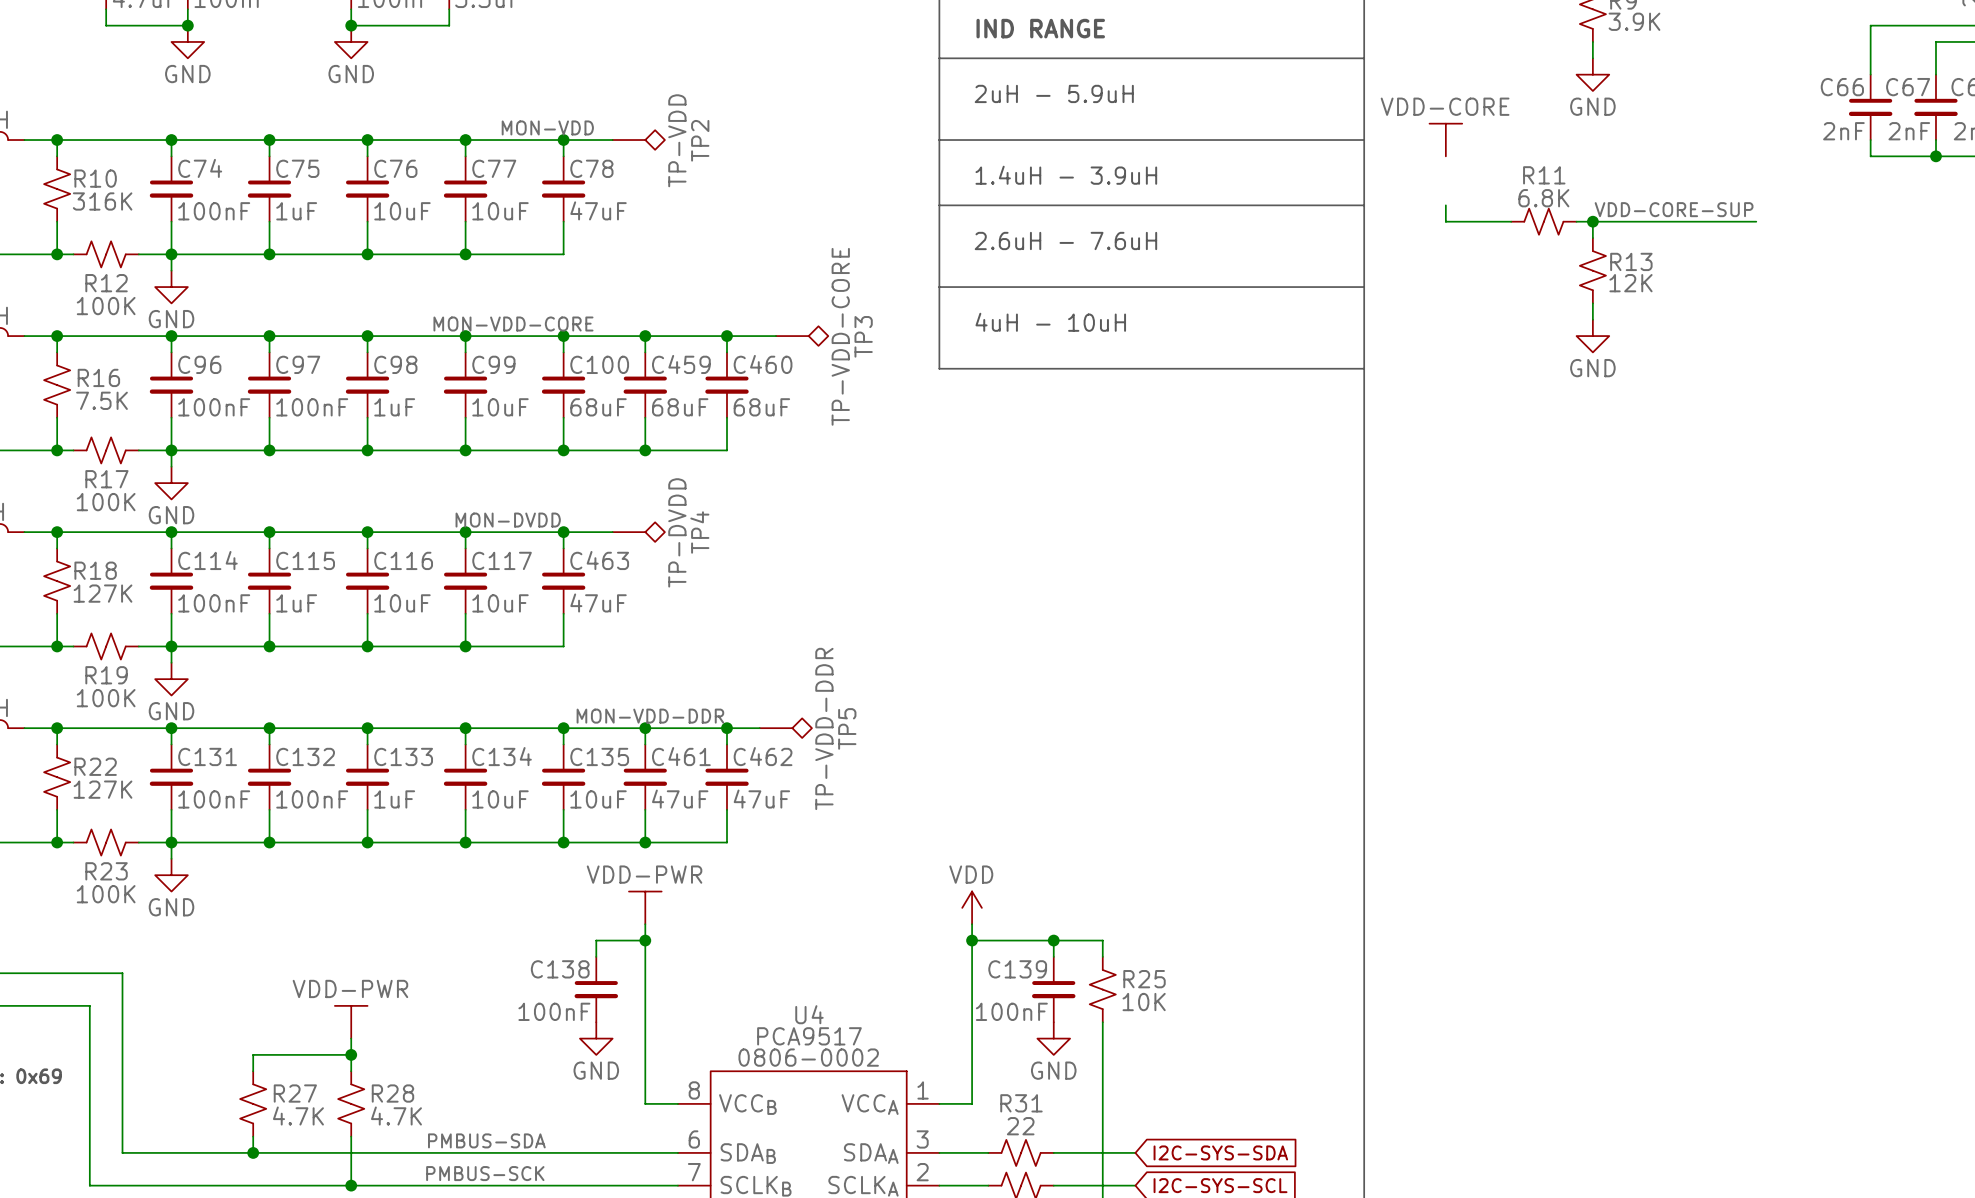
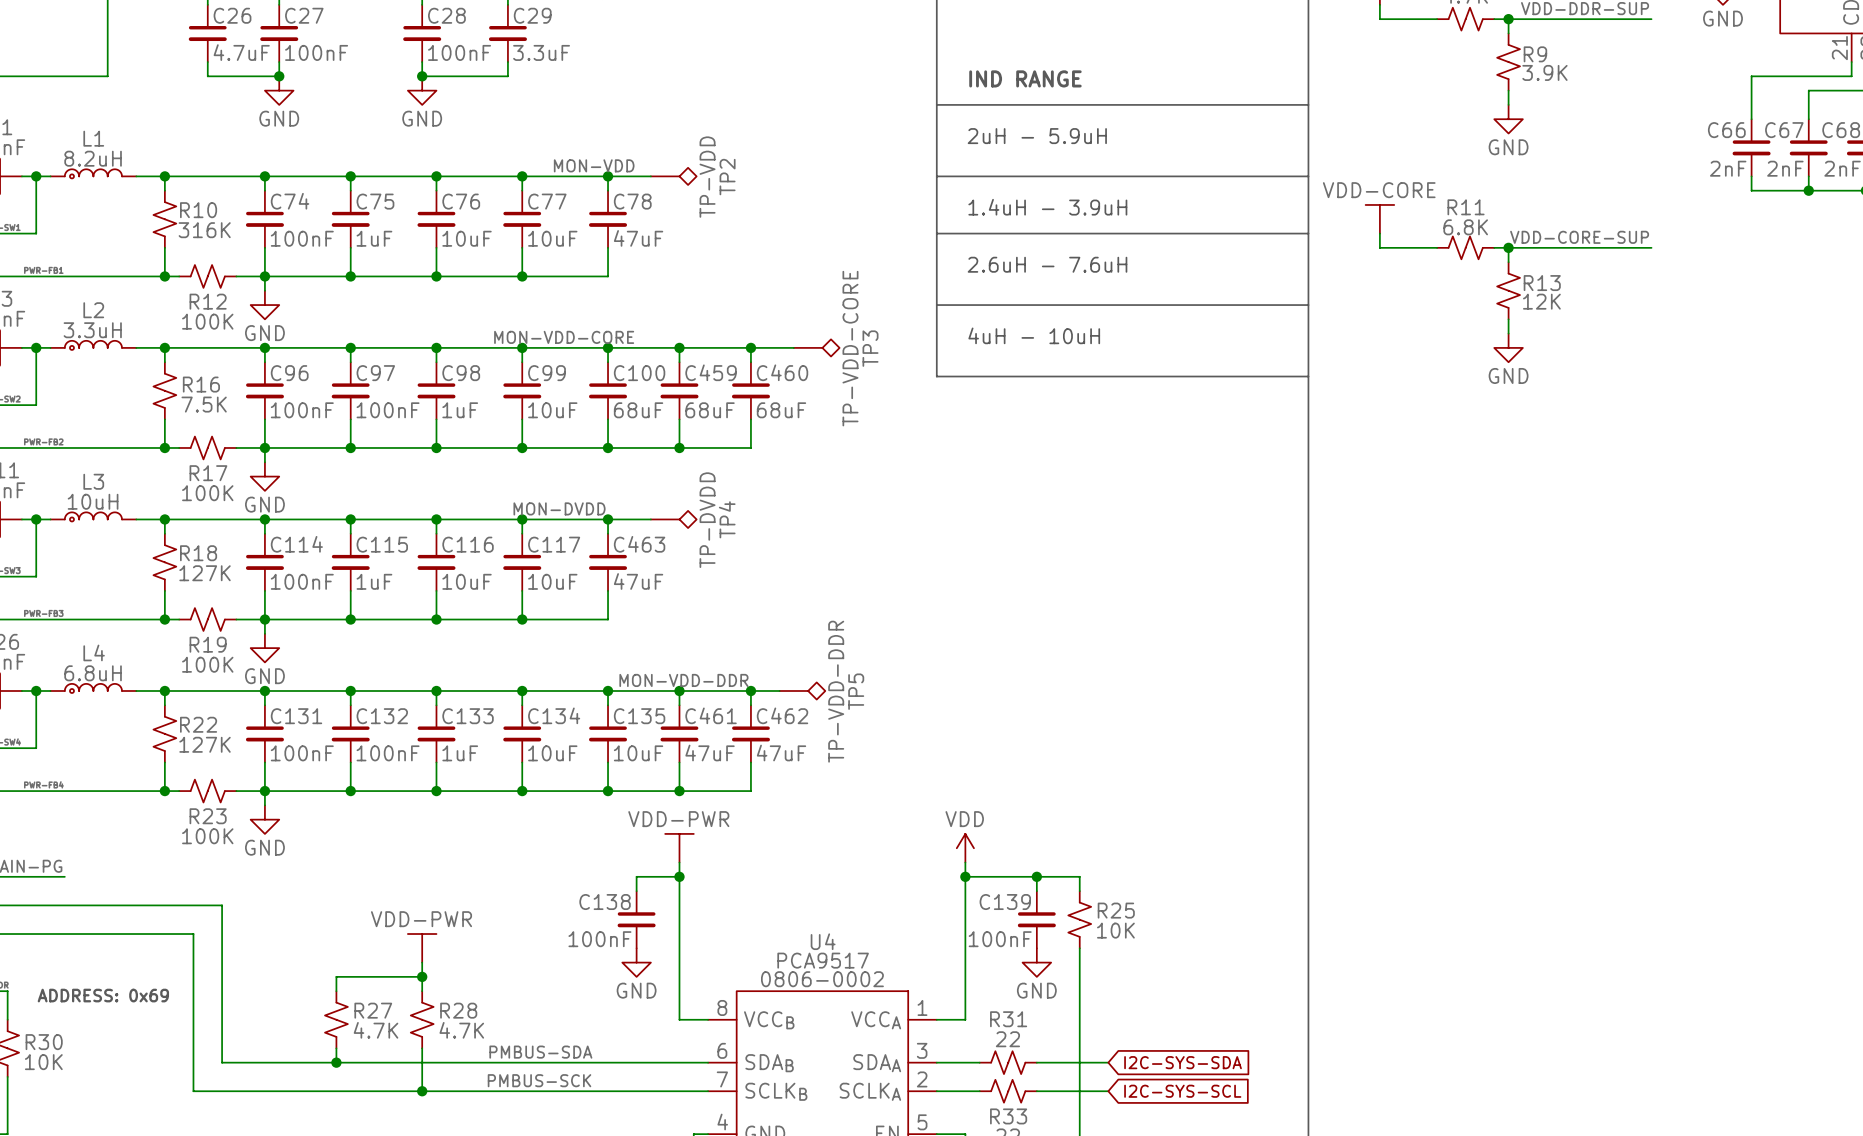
power symbol position: VDD-CORE (1445, 140) -> VDD-CORE (1379, 219)

